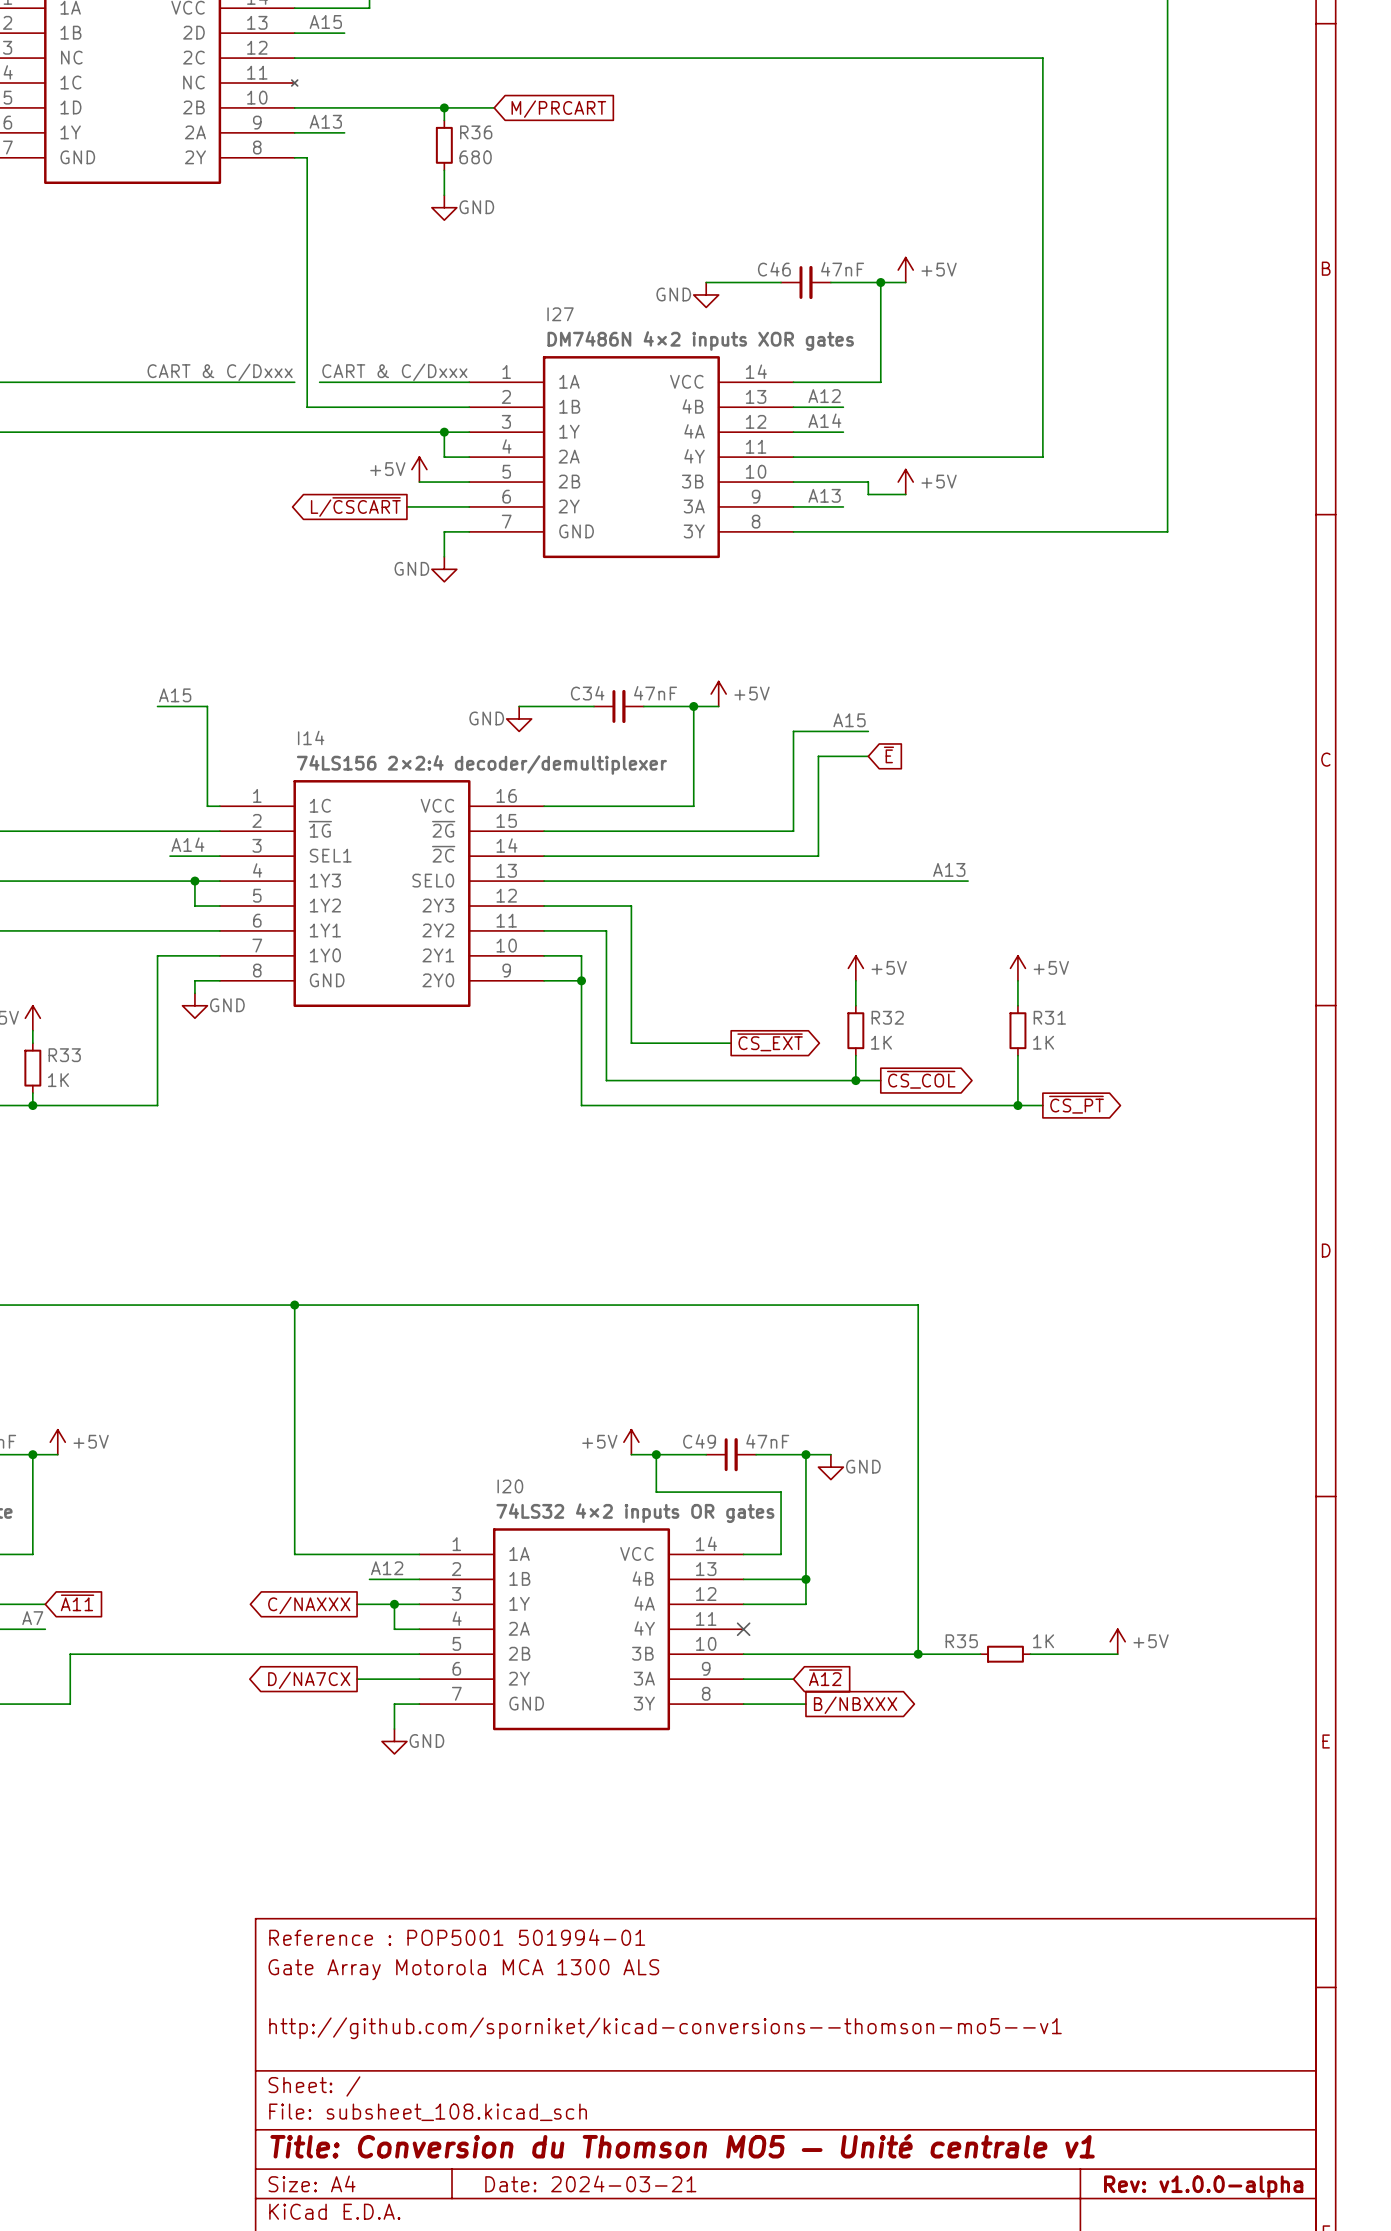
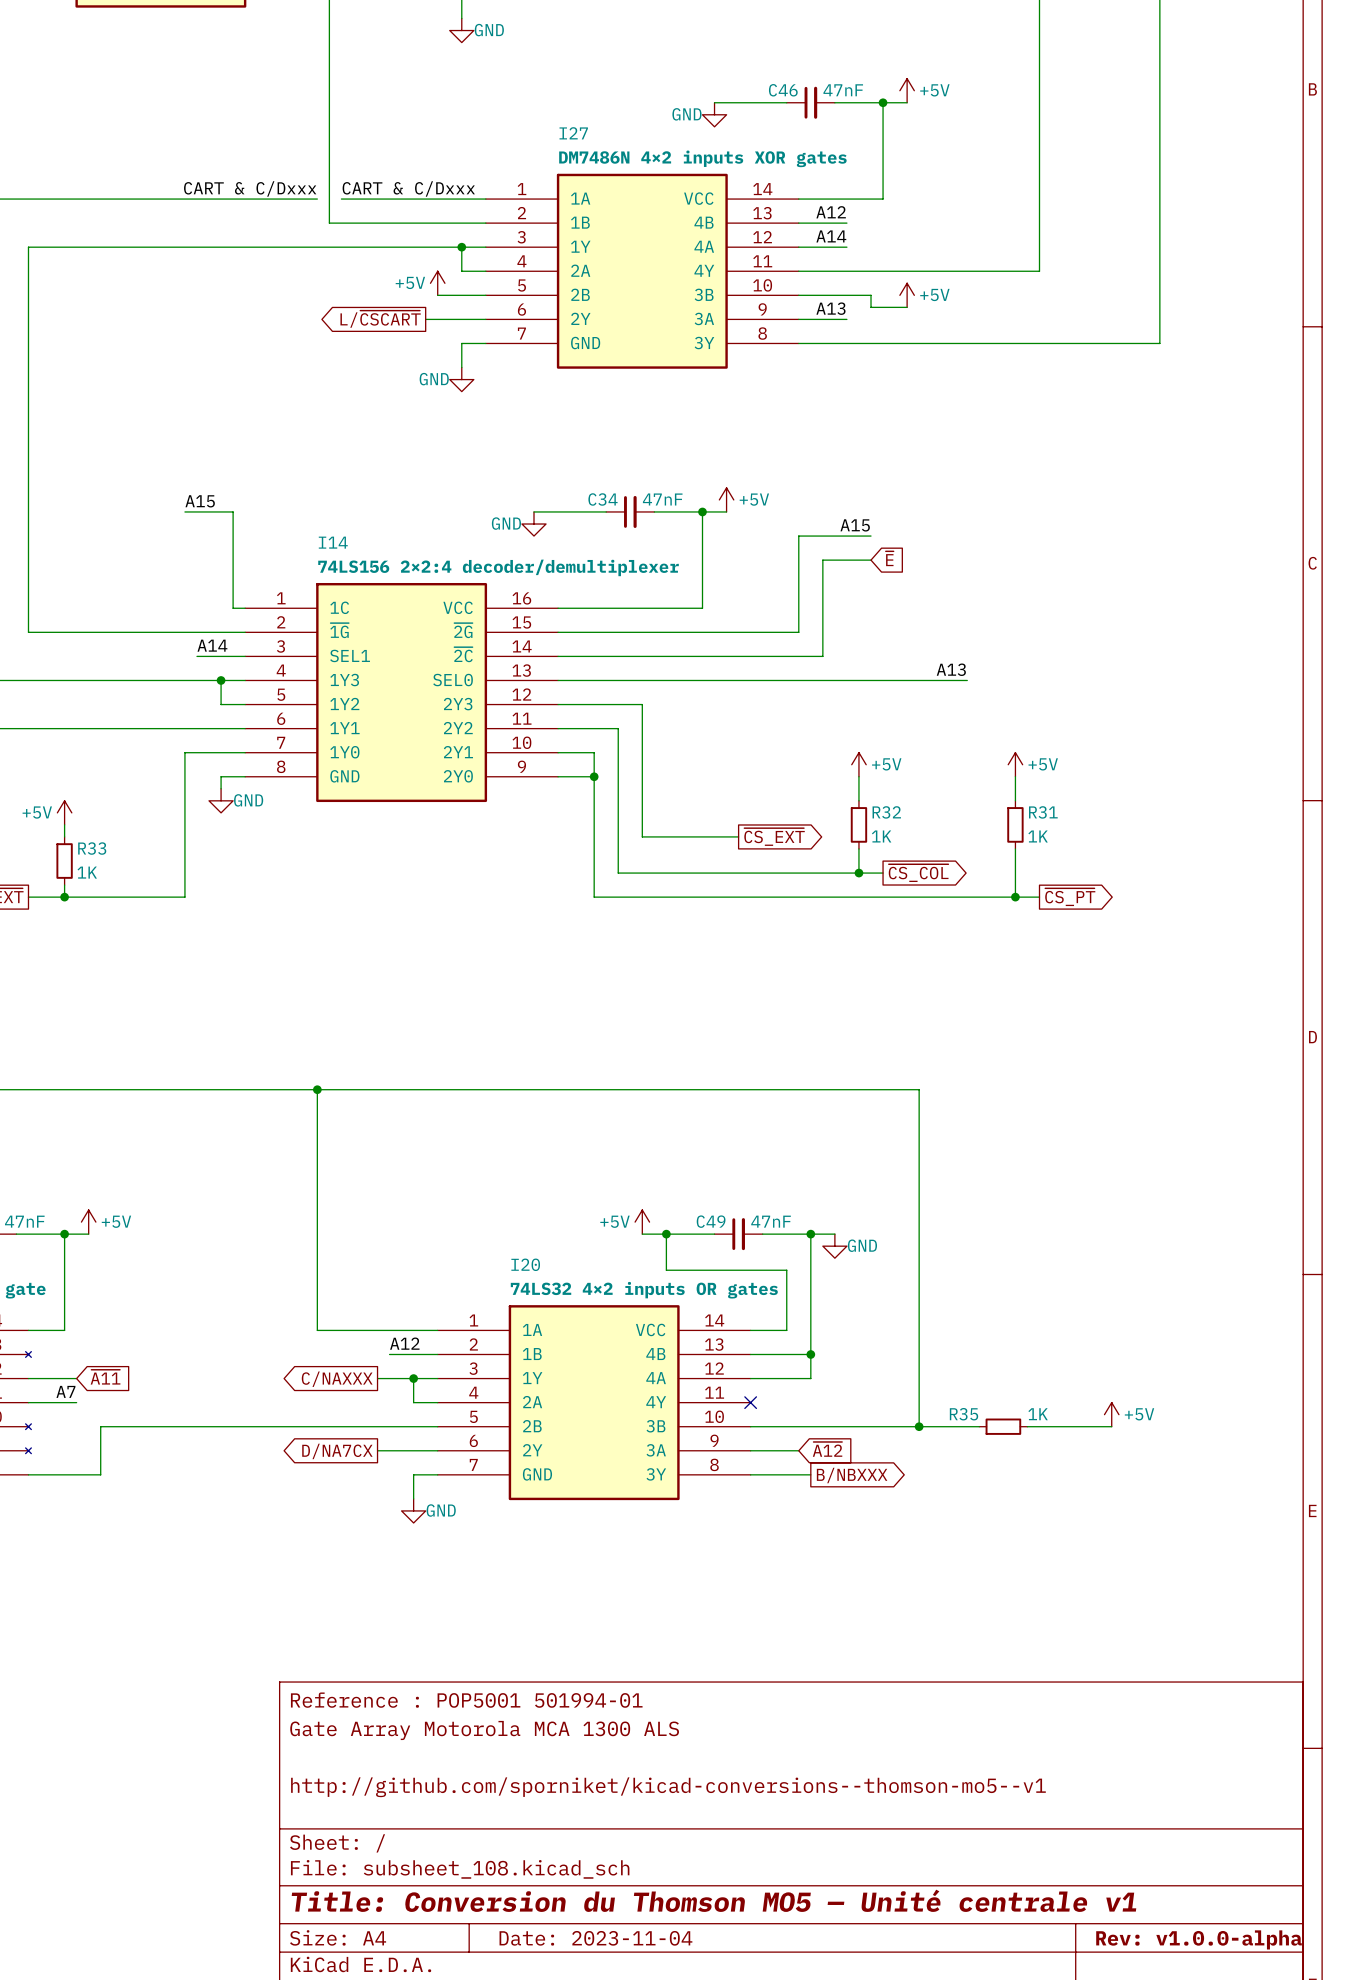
title block: Date: 2024-03-21 (590, 2183) -> Date: 2023-11-04 (595, 1938)

